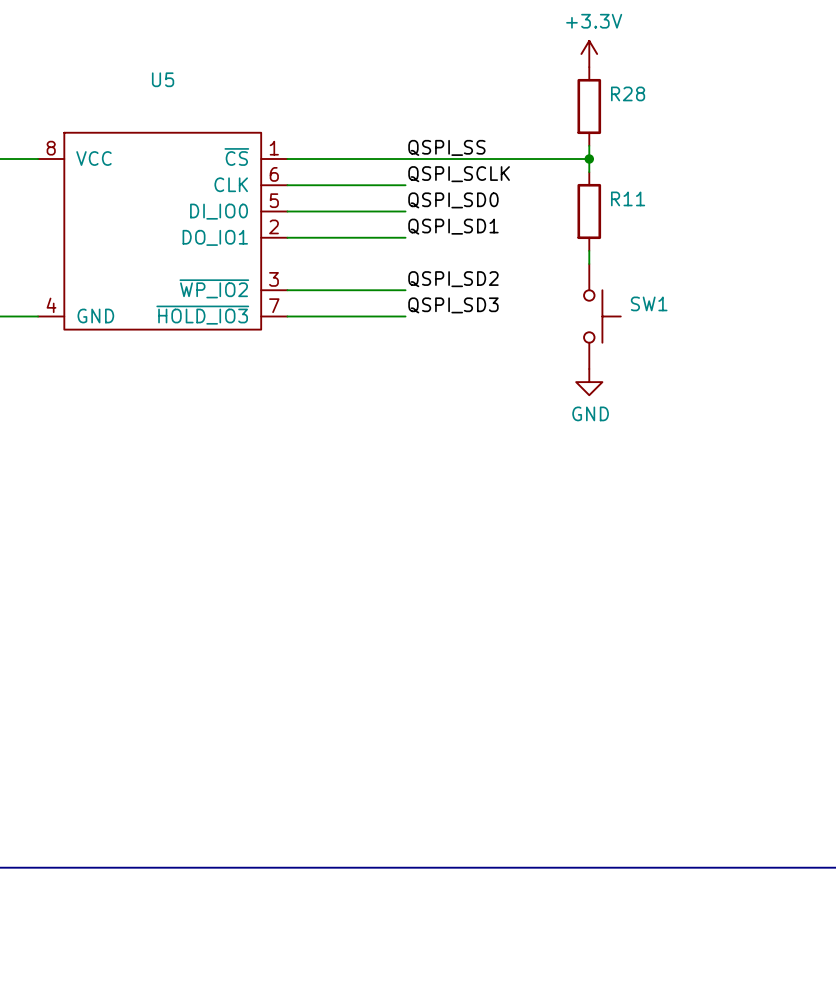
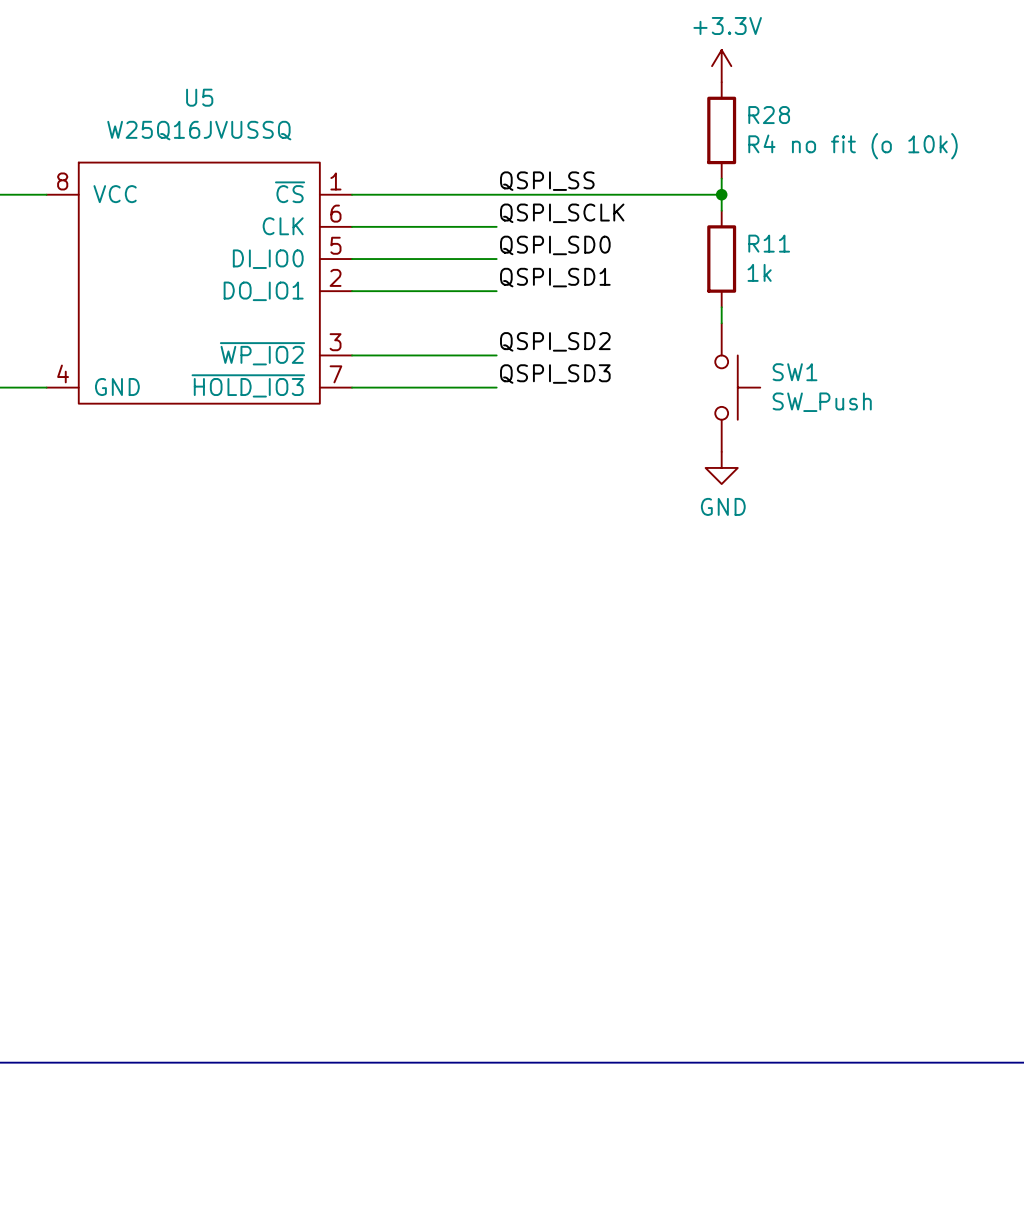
U5 value: none -> W25Q16JVUSSQ (199, 130)
R28 value: none -> R4 no fit (o 10k) (852, 146)
R11 value: none -> 1k (759, 272)
SW1 value: none -> SW_Push (822, 402)

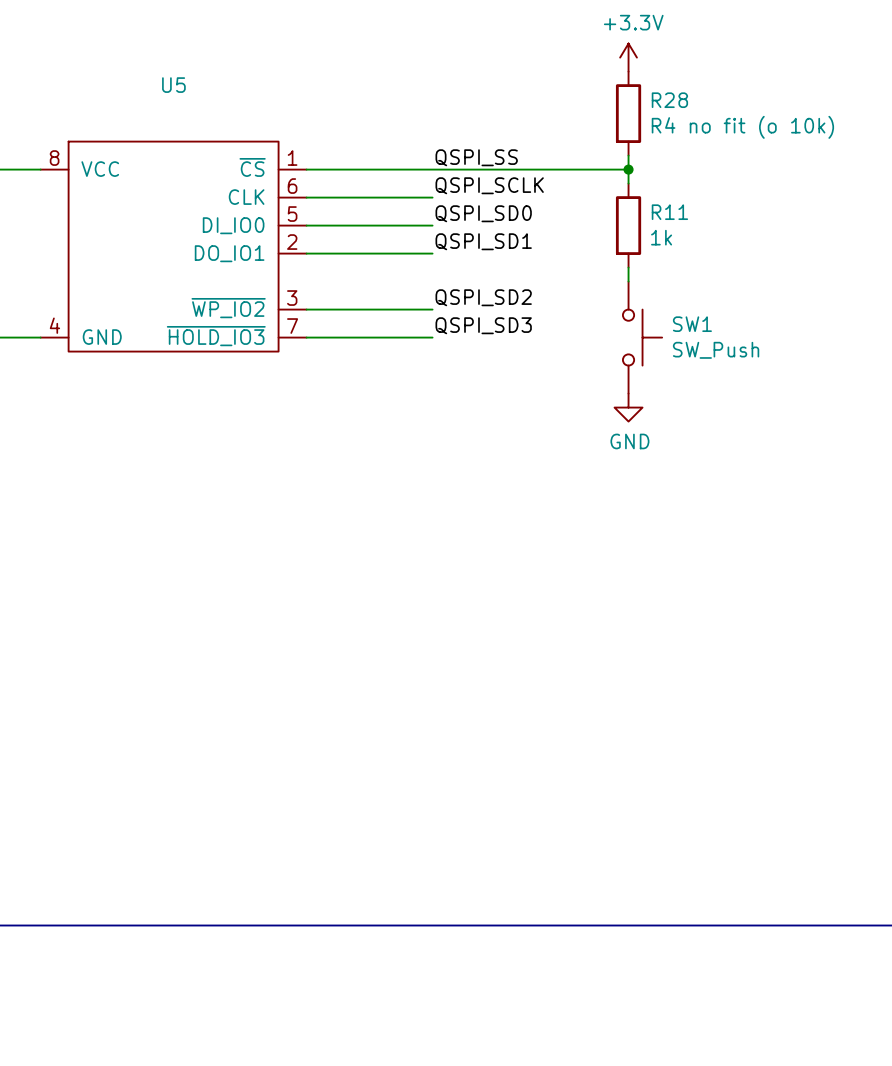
U5 value: W25Q16JVUSSQ (199, 130) -> none

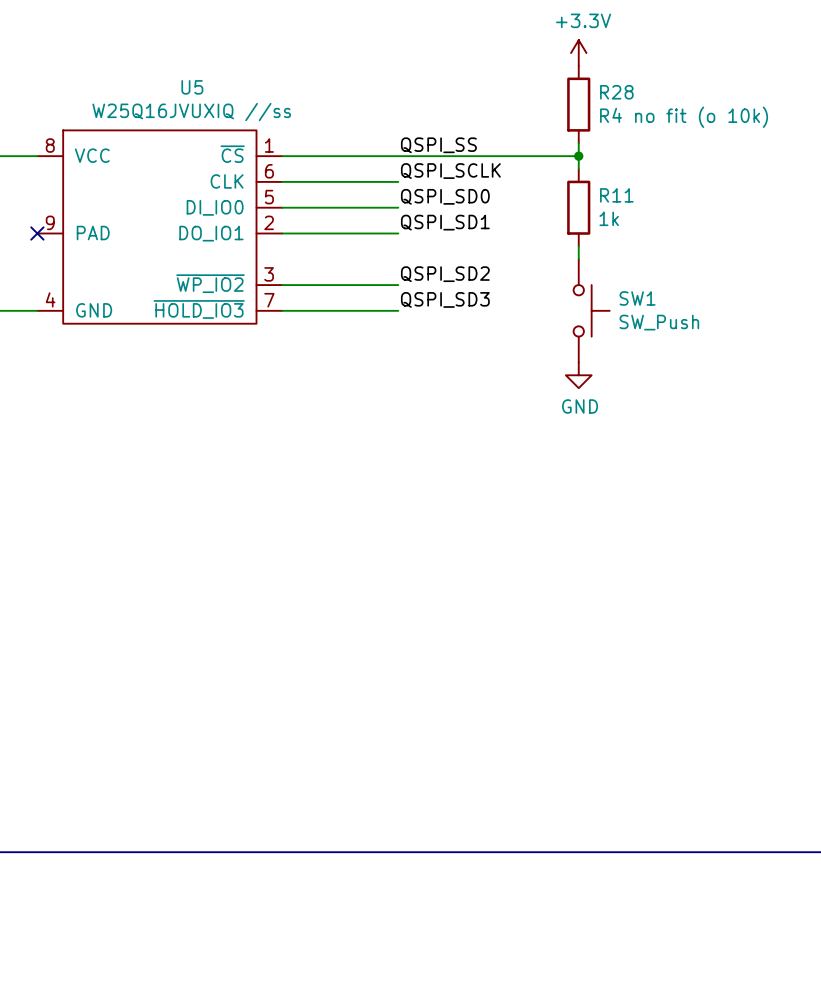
U5 name position: U5 (173, 85) -> U5 (192, 87)
U5 value: none -> W25Q16JVUXIQ //ss (191, 112)
U5 symbol: [40, 141, 307, 352] -> [37, 130, 283, 324]
no-connect mark: none -> (37, 233)

